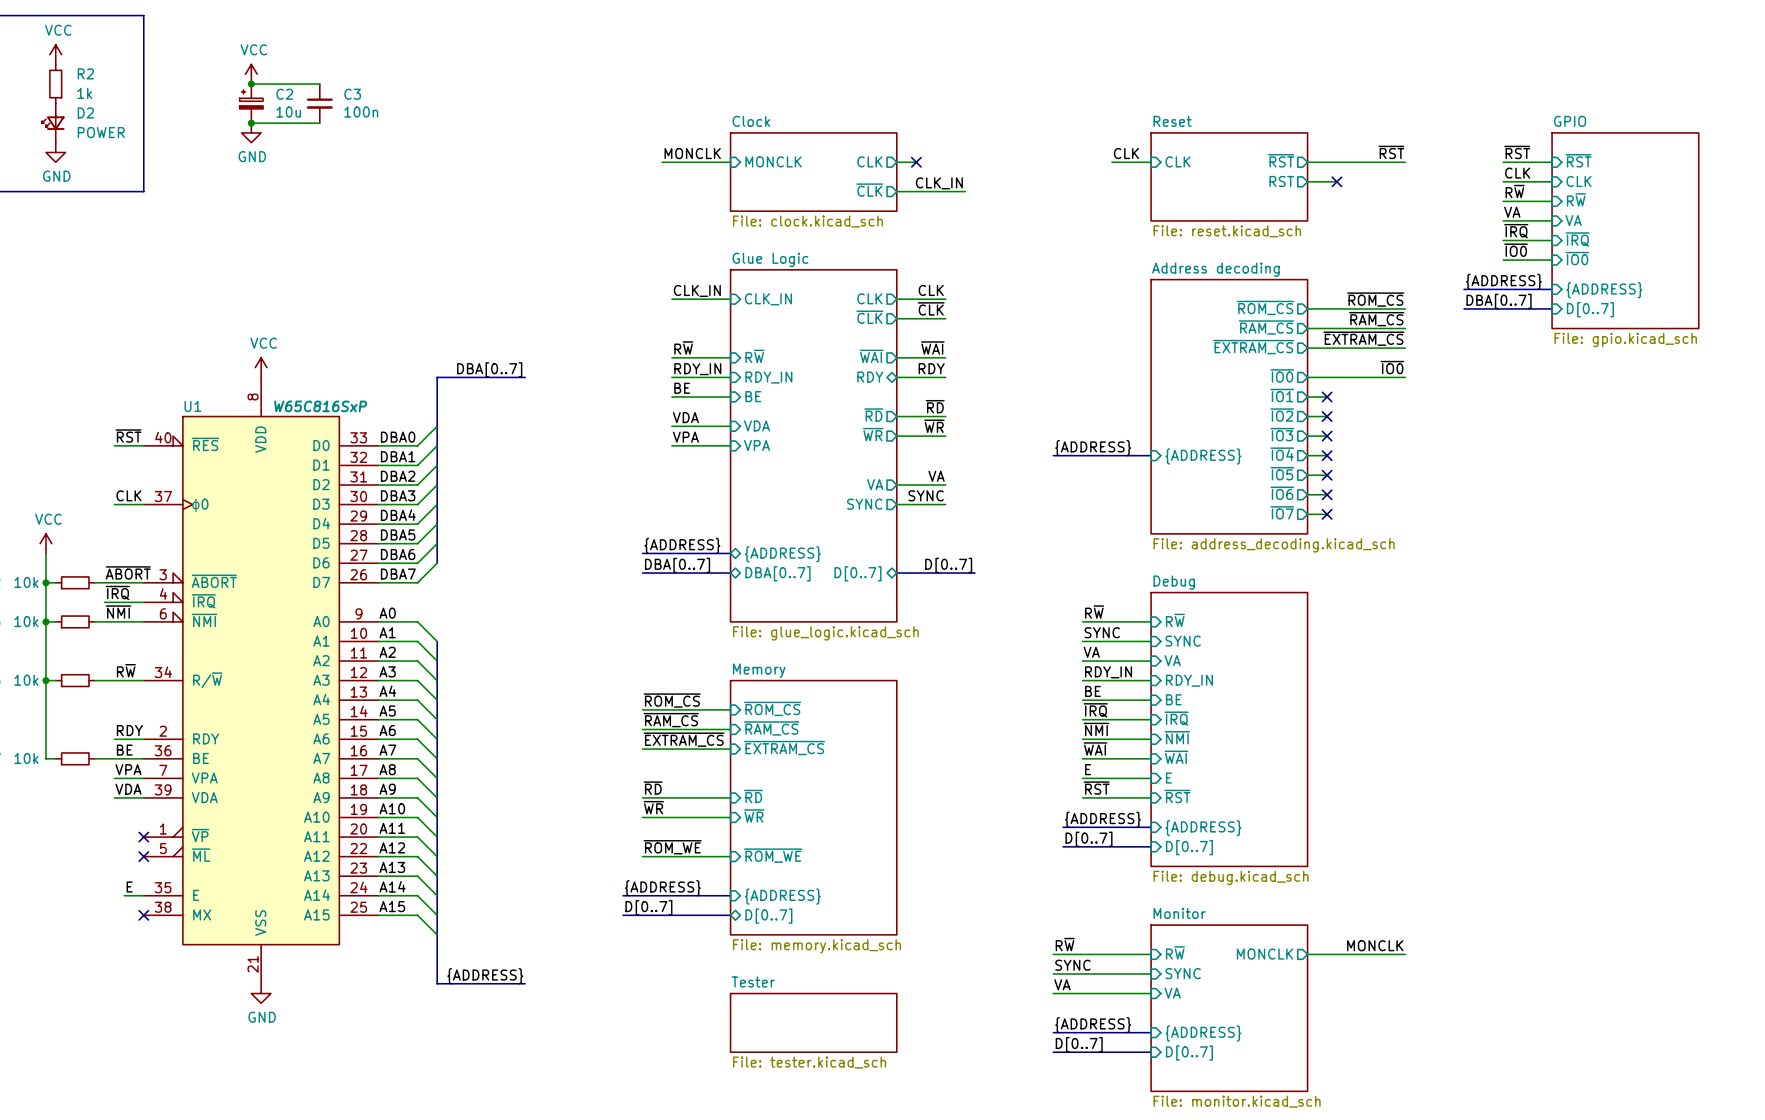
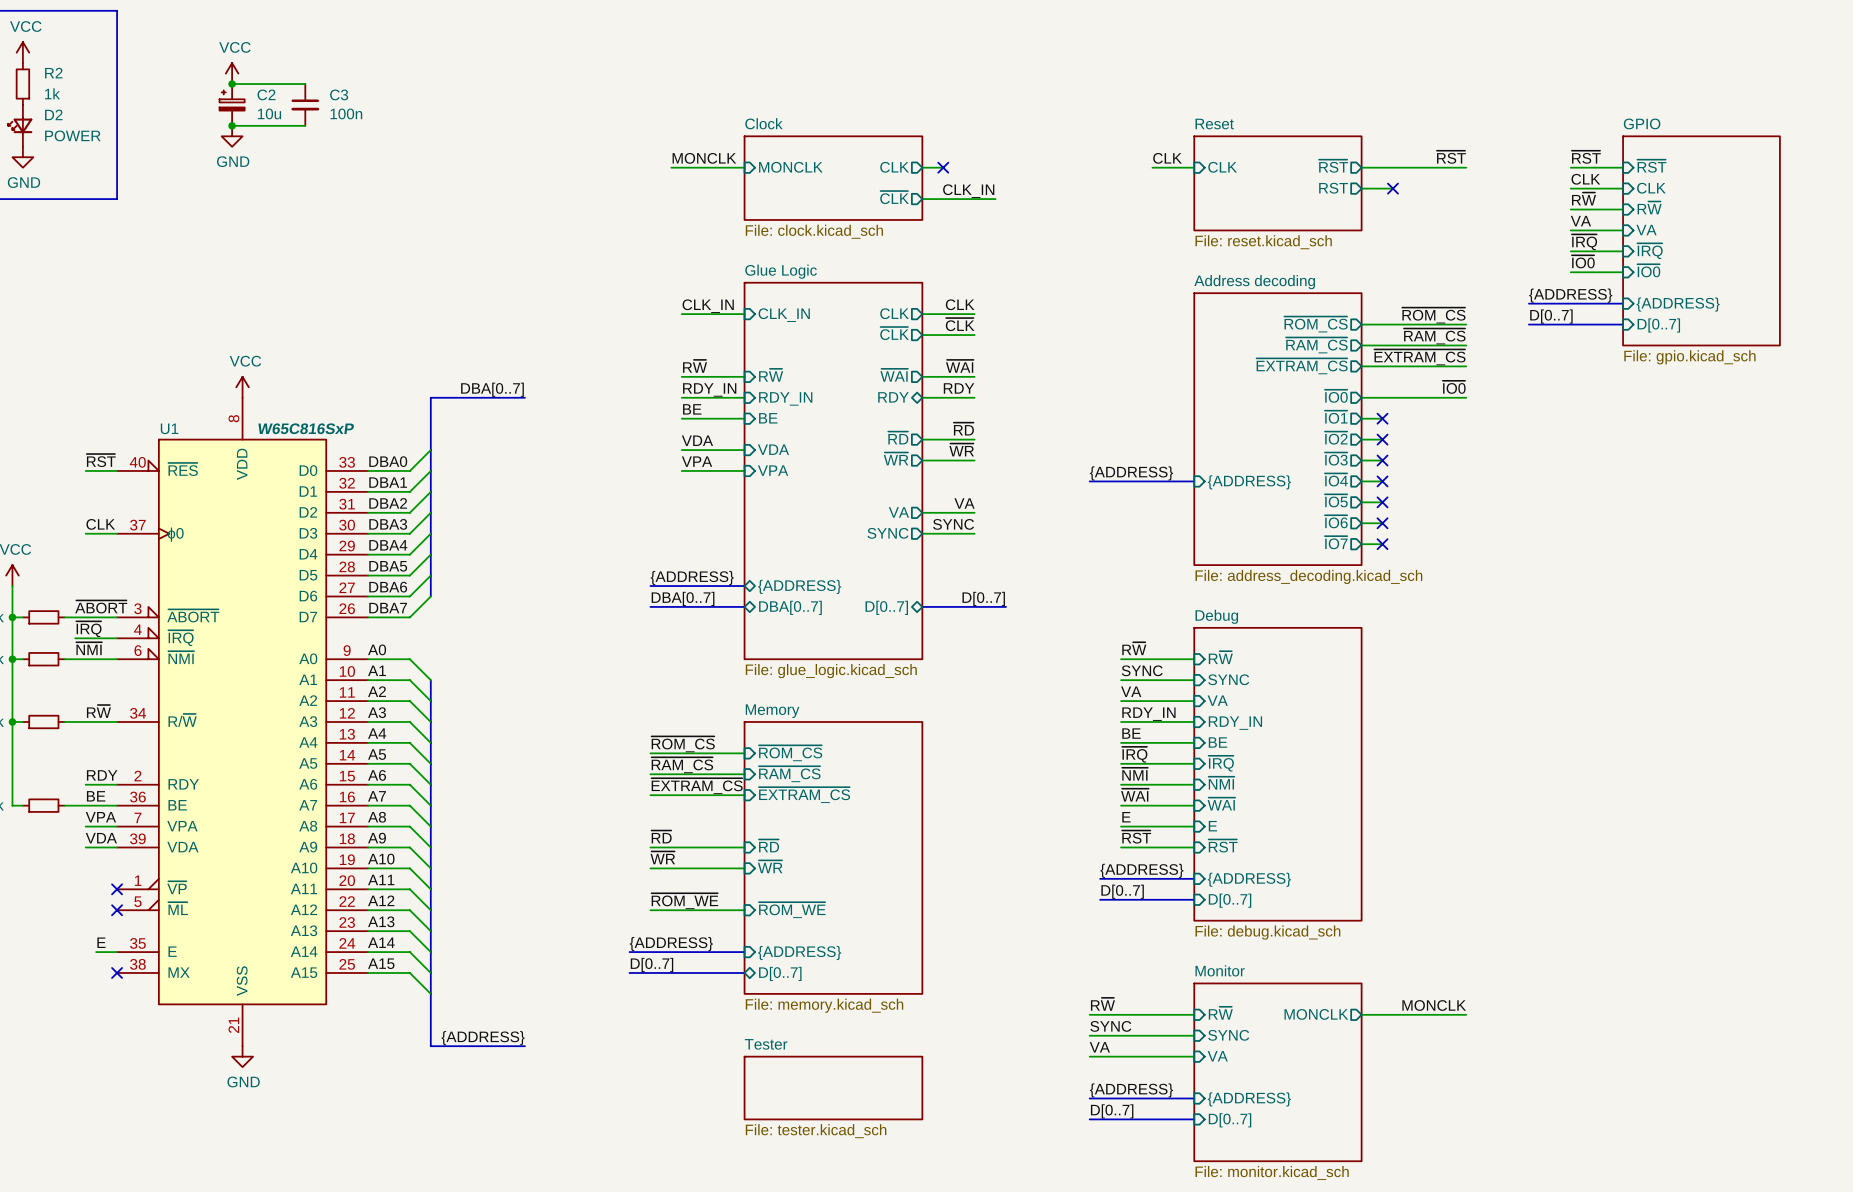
label: DBA[0..7] (1499, 301) -> D[0..7] (1551, 316)

